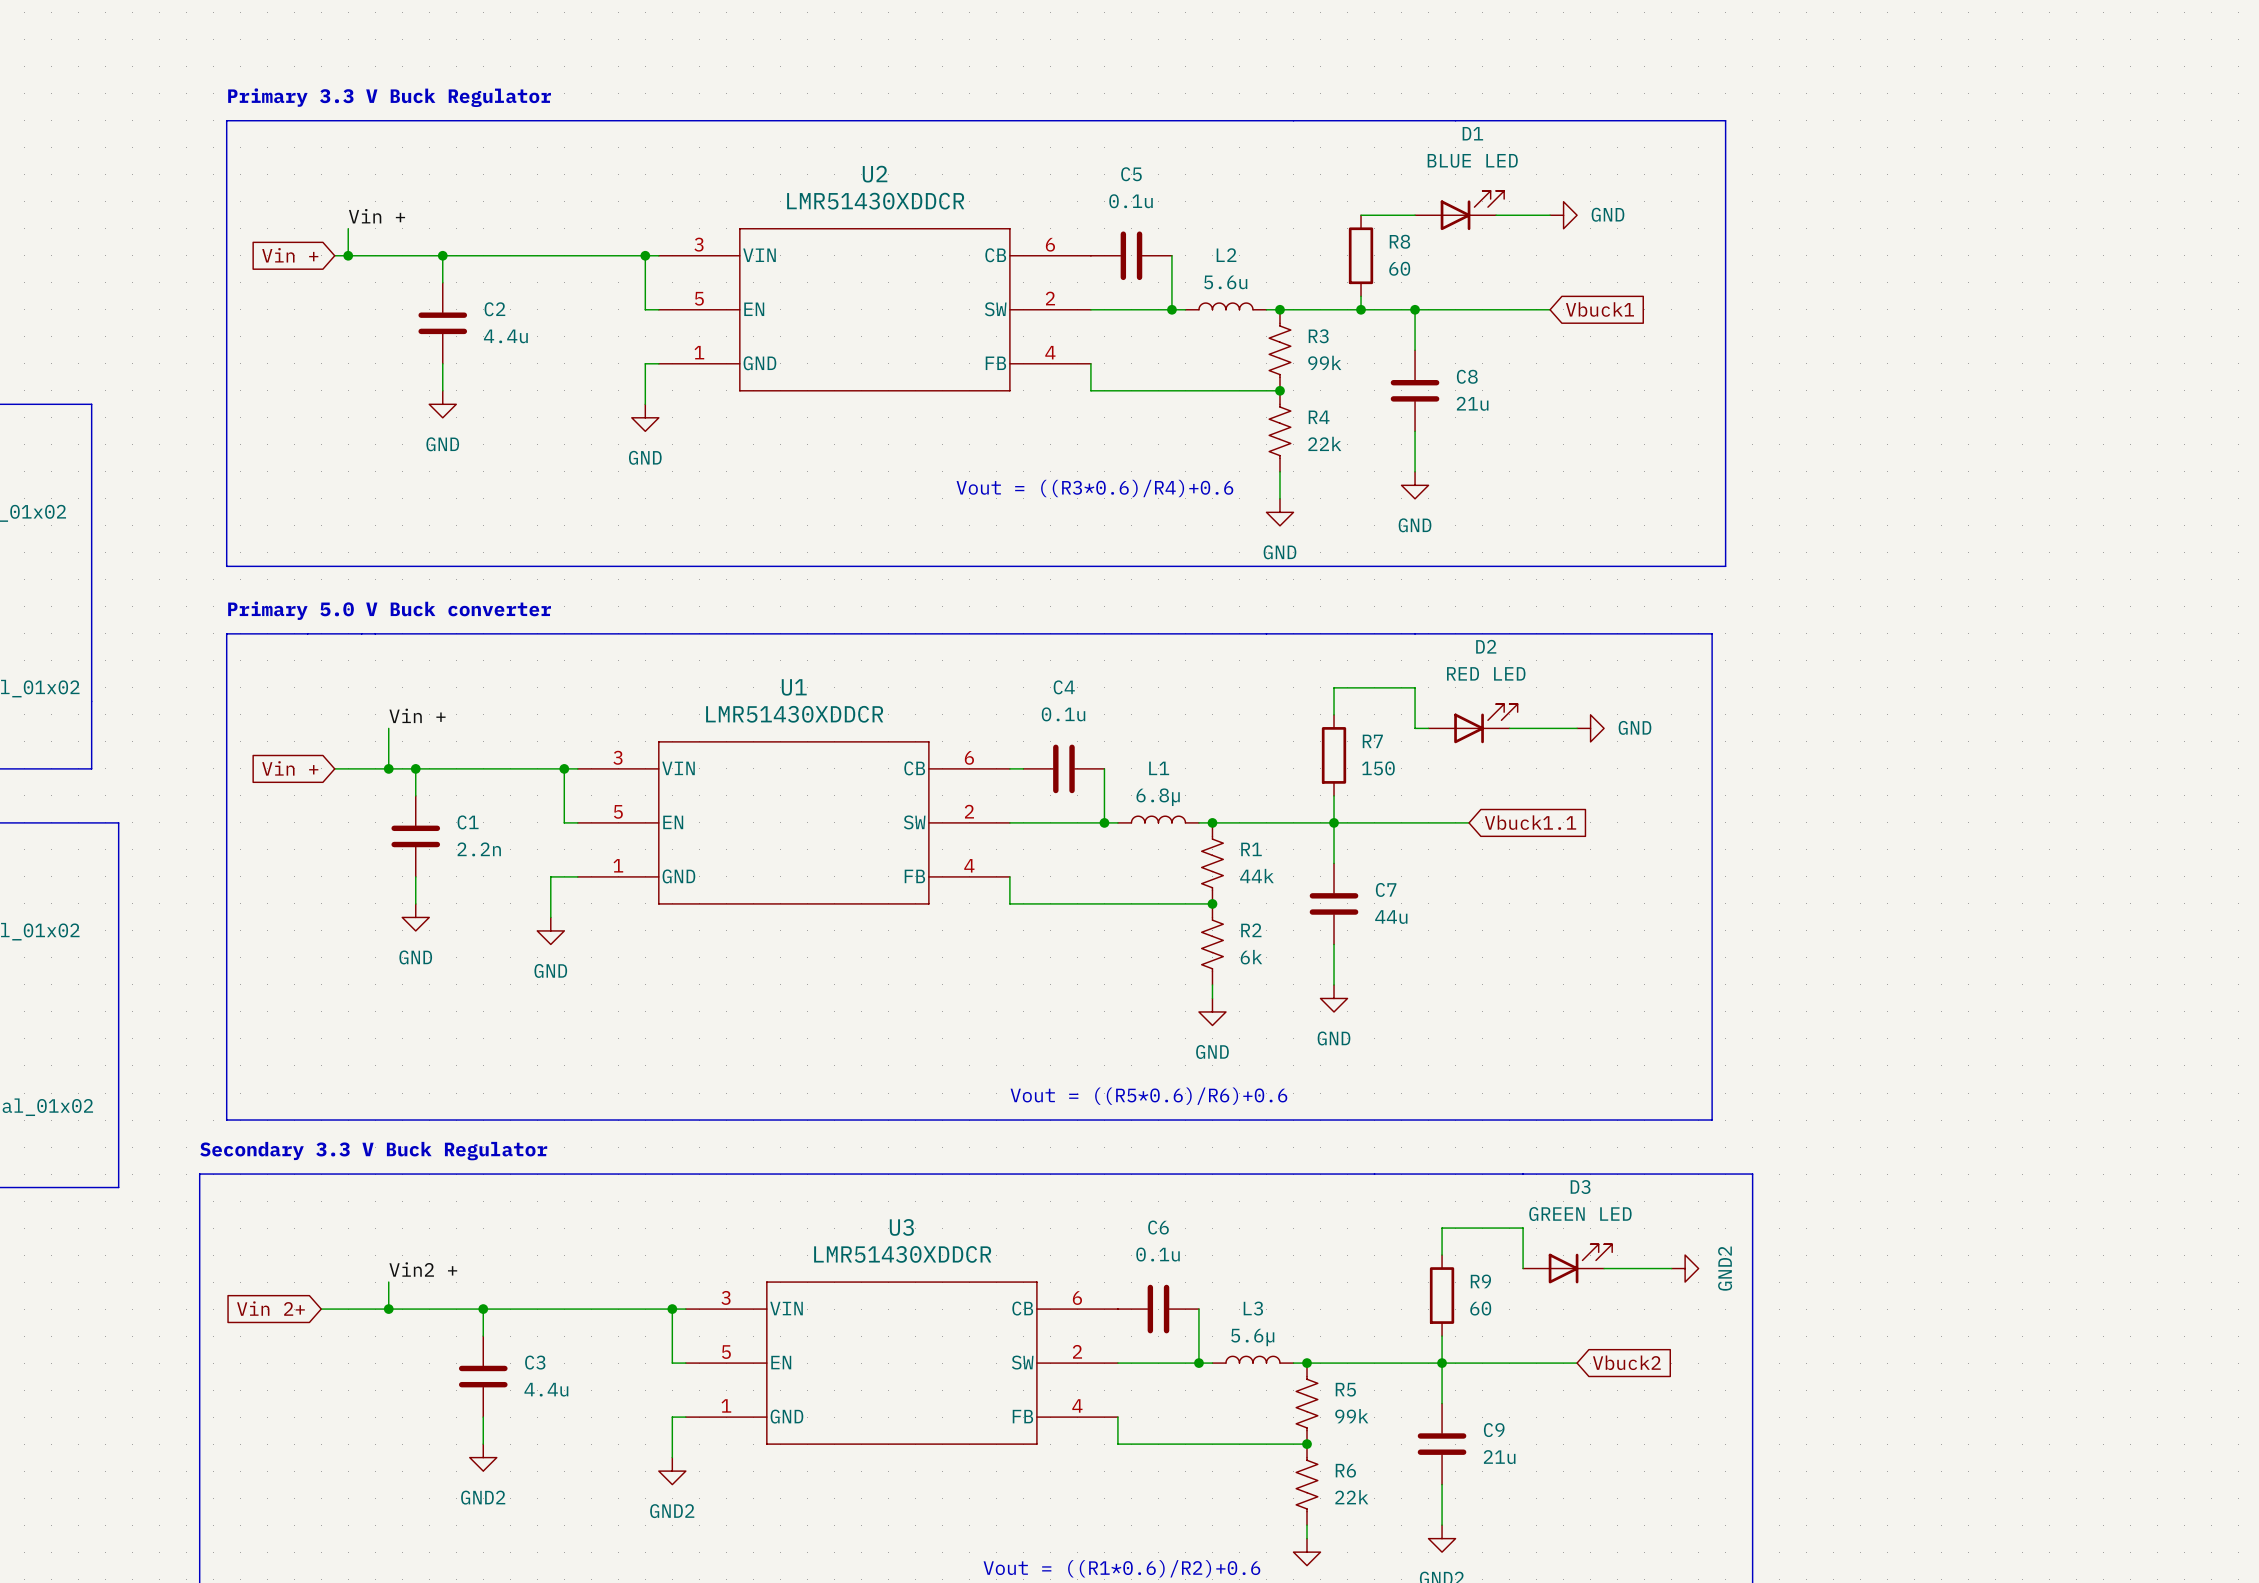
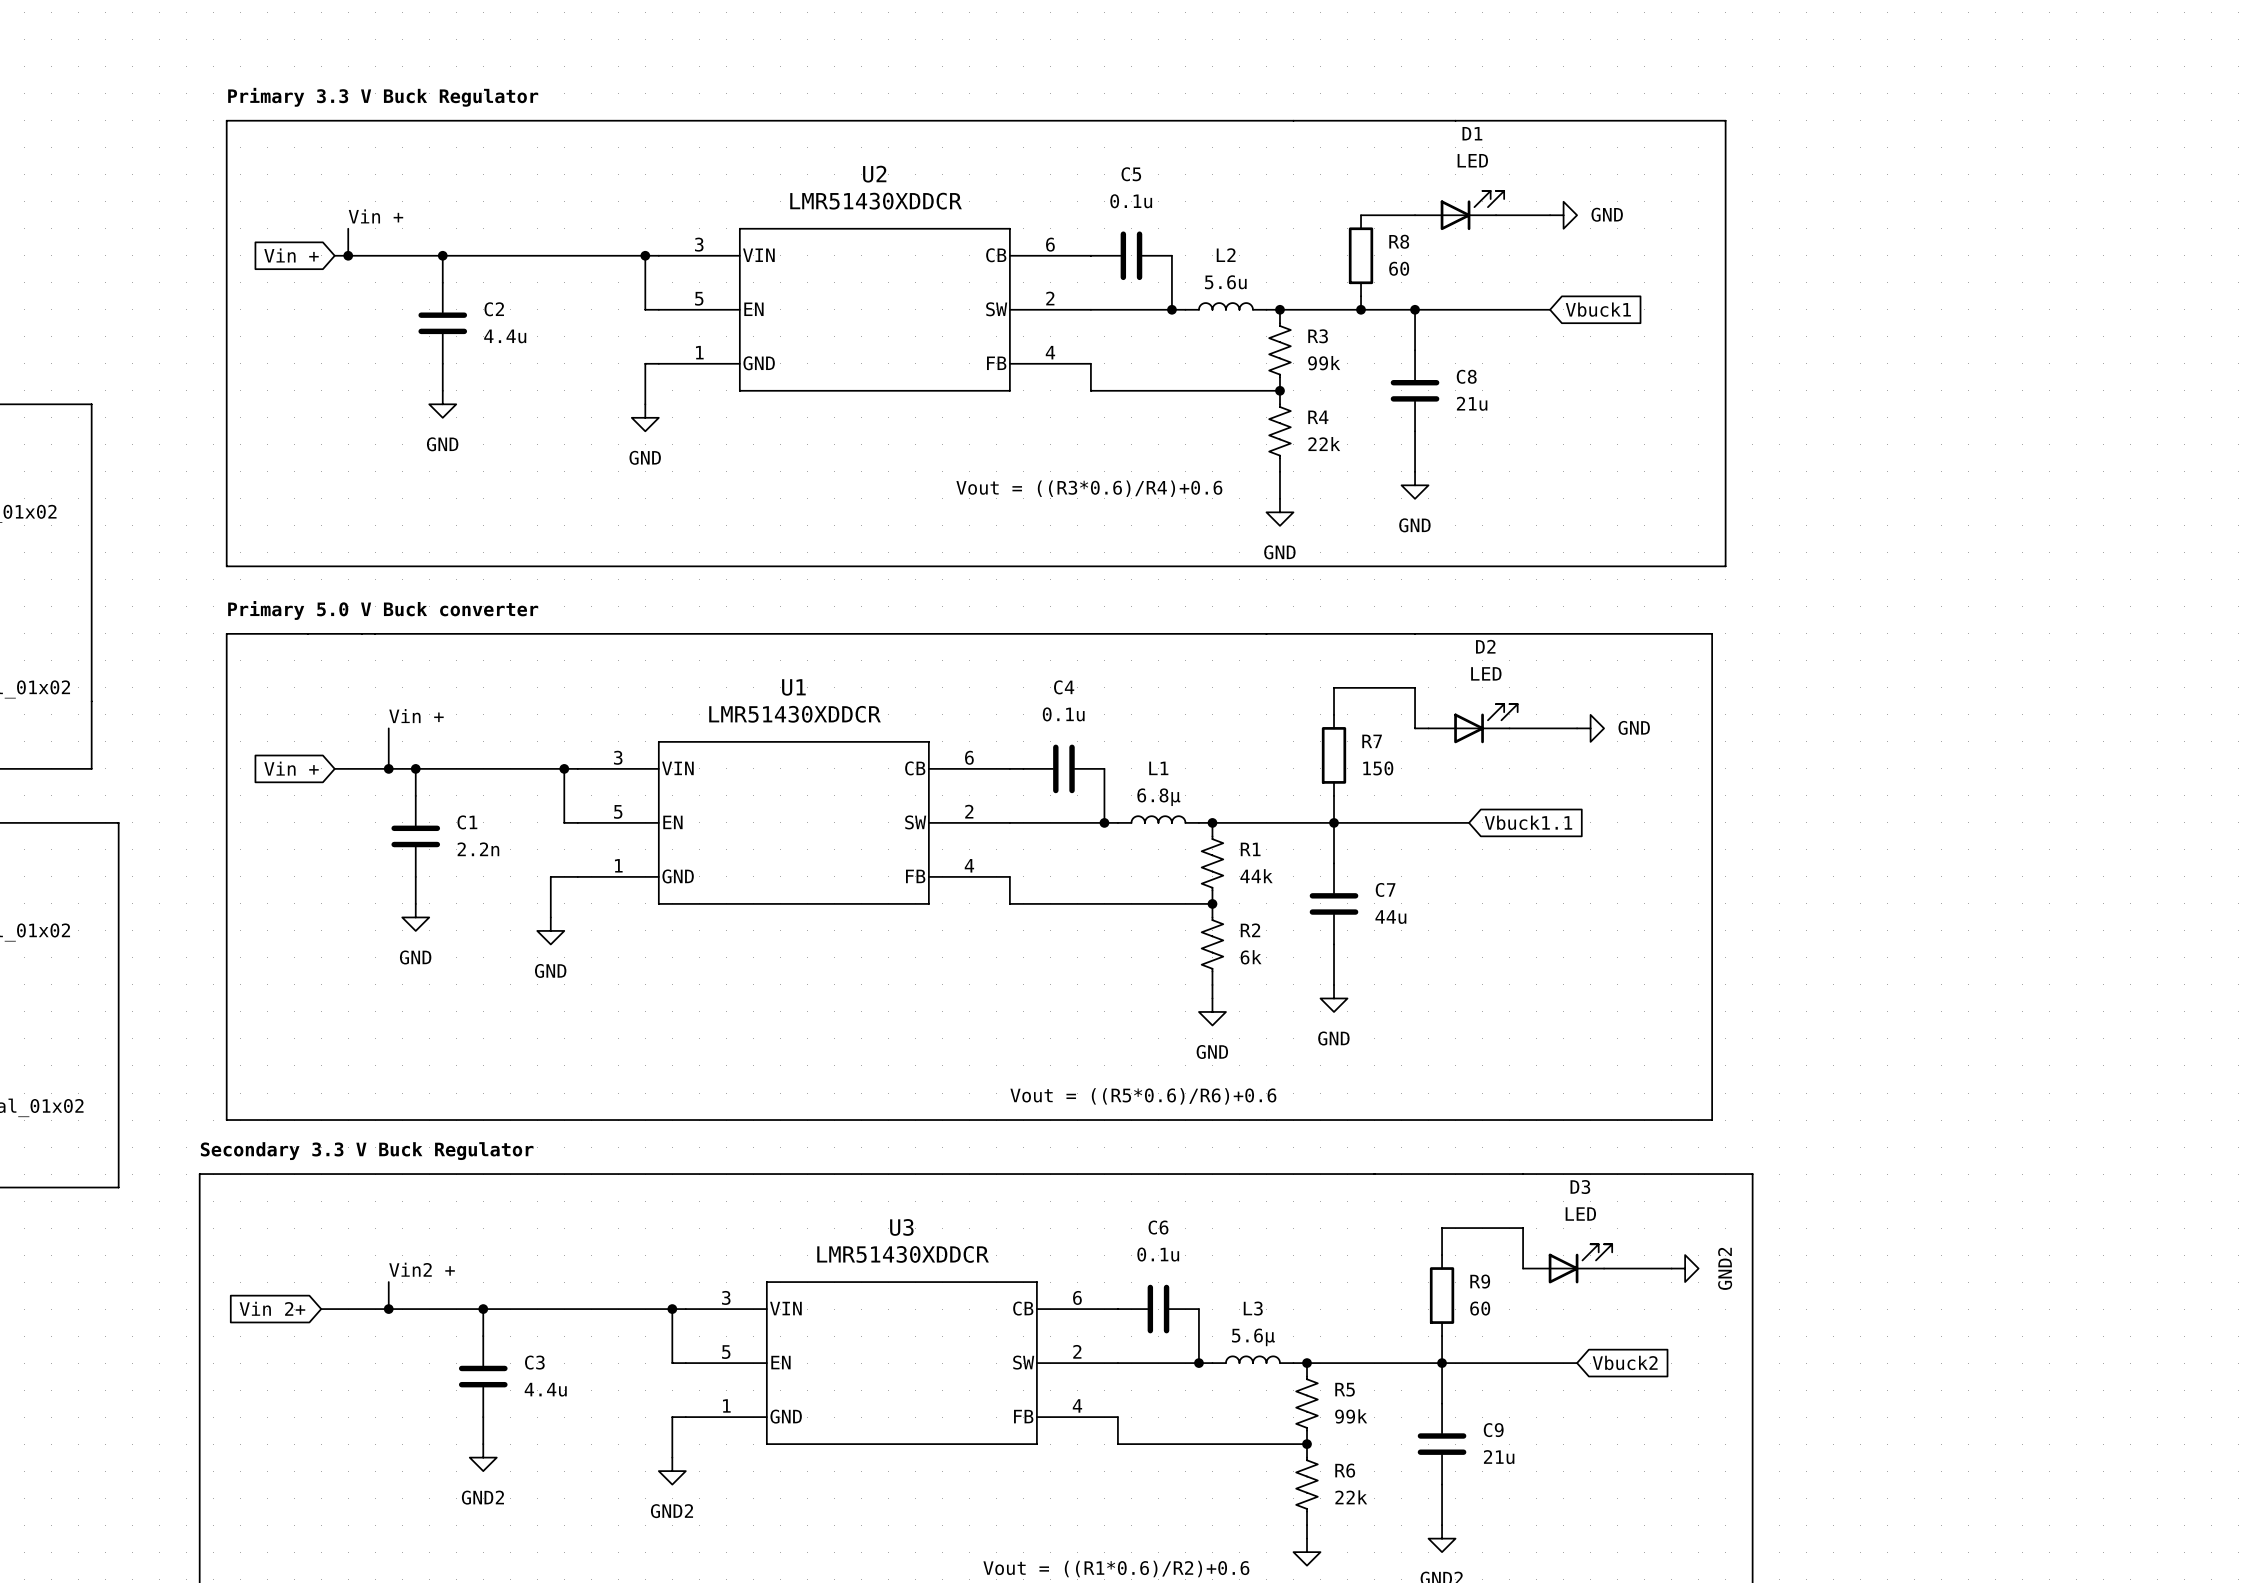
D1 value: BLUE LED (1472, 160) -> LED (1472, 160)
D2 value: RED LED (1486, 673) -> LED (1486, 673)
D3 value: GREEN LED (1580, 1214) -> LED (1580, 1214)

